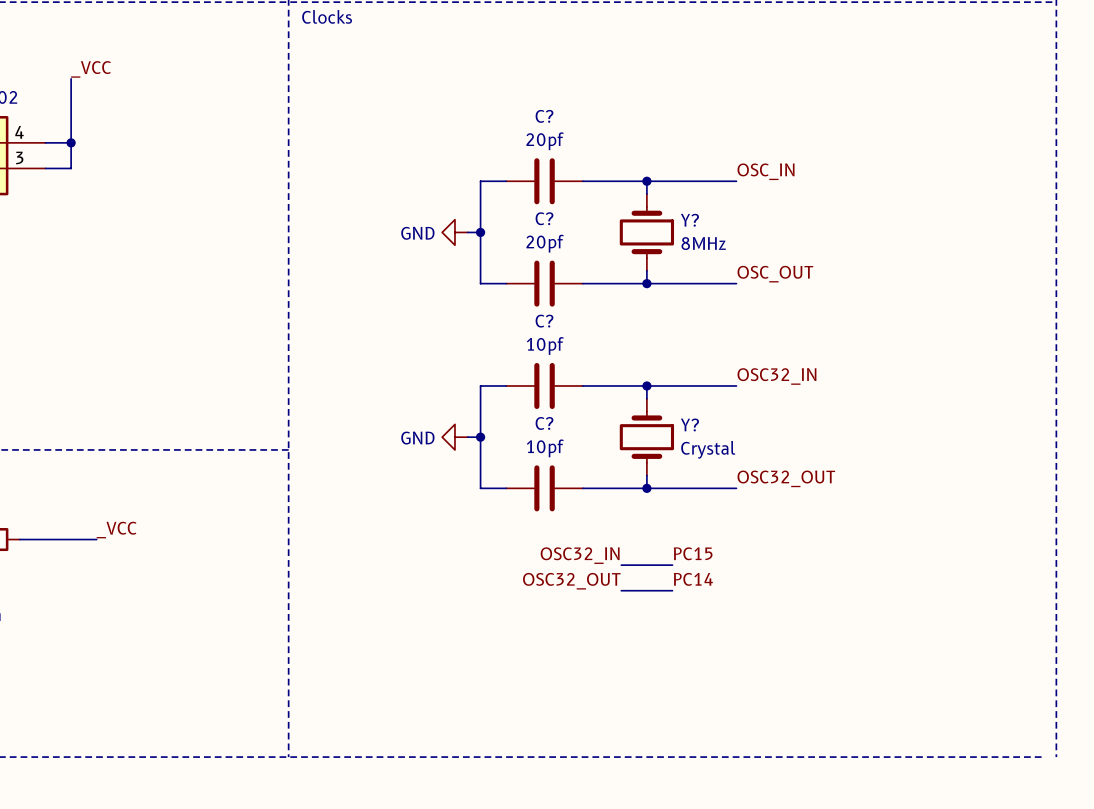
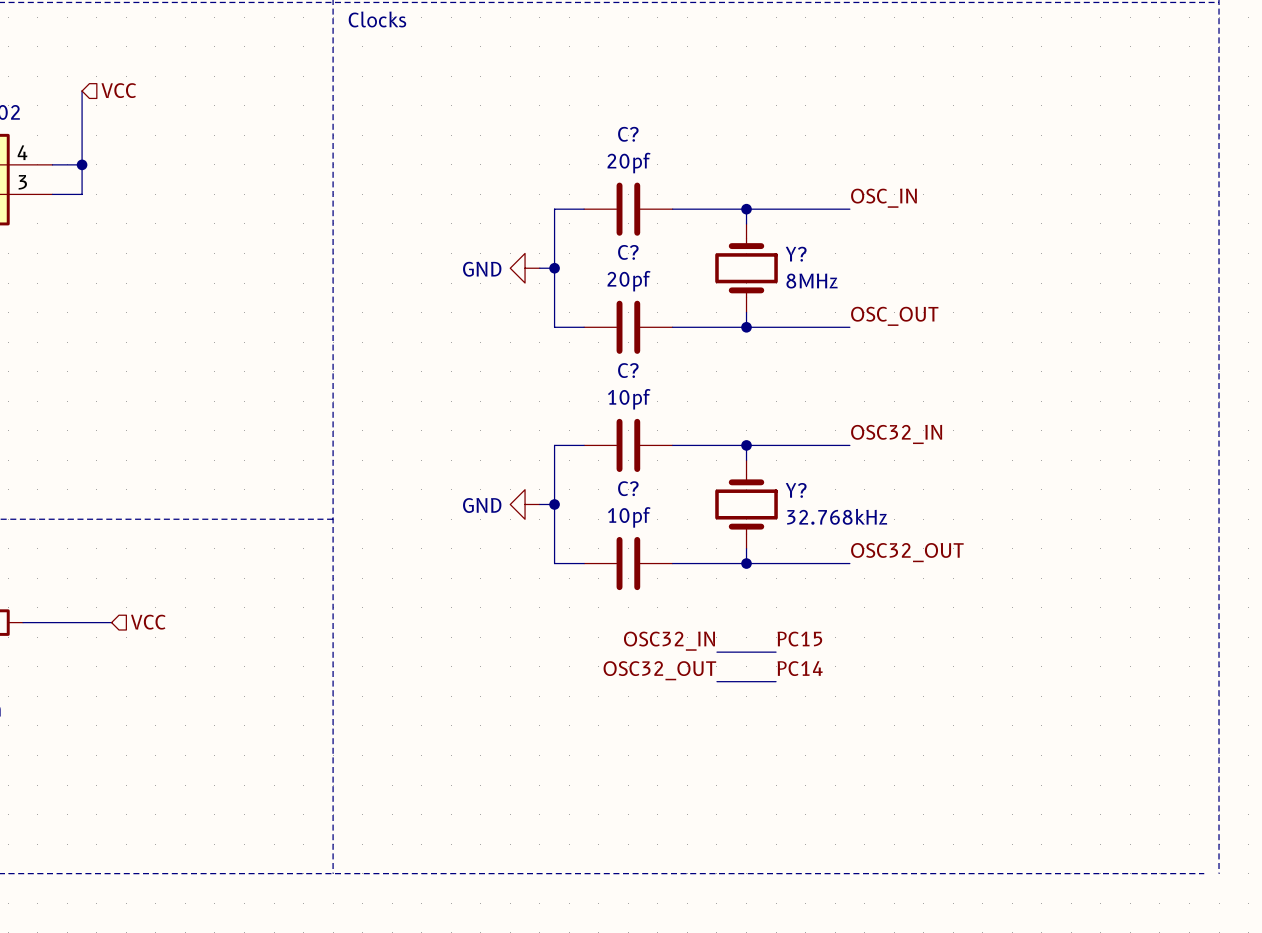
label: _VCC (90, 69) -> none
hierarchical label: none -> VCC (118, 90)
Y? value: Crystal (708, 449) -> 32.768kHz (837, 516)
label: _VCC (116, 530) -> none
hierarchical label: none -> VCC (148, 622)

